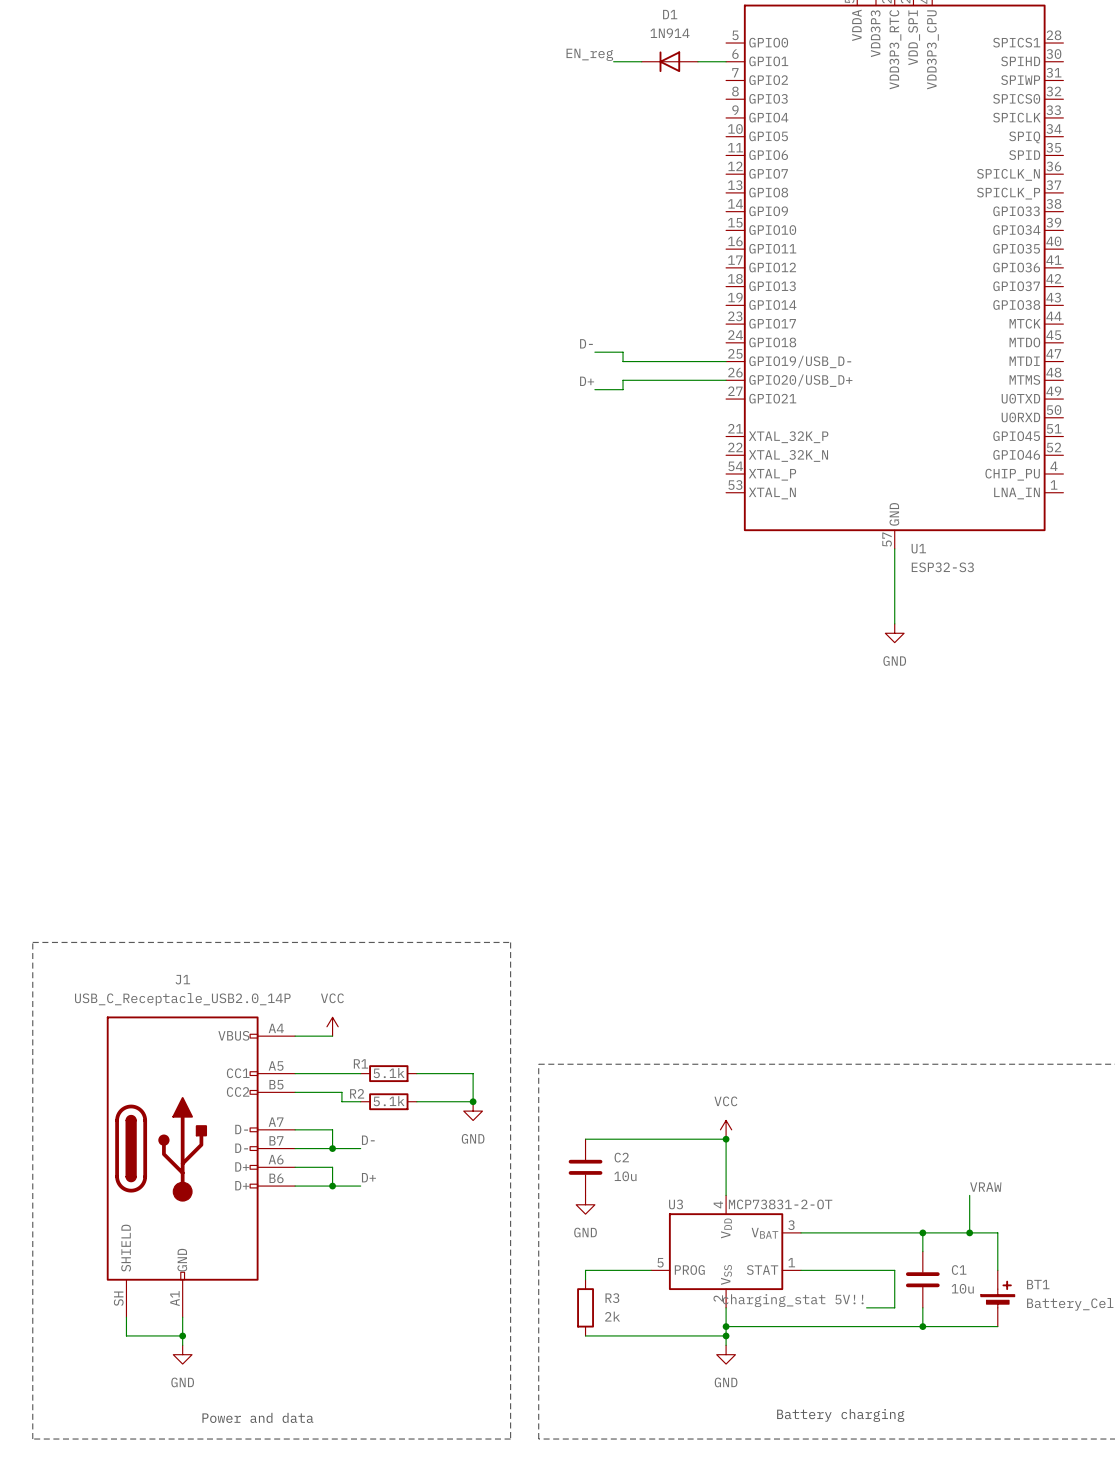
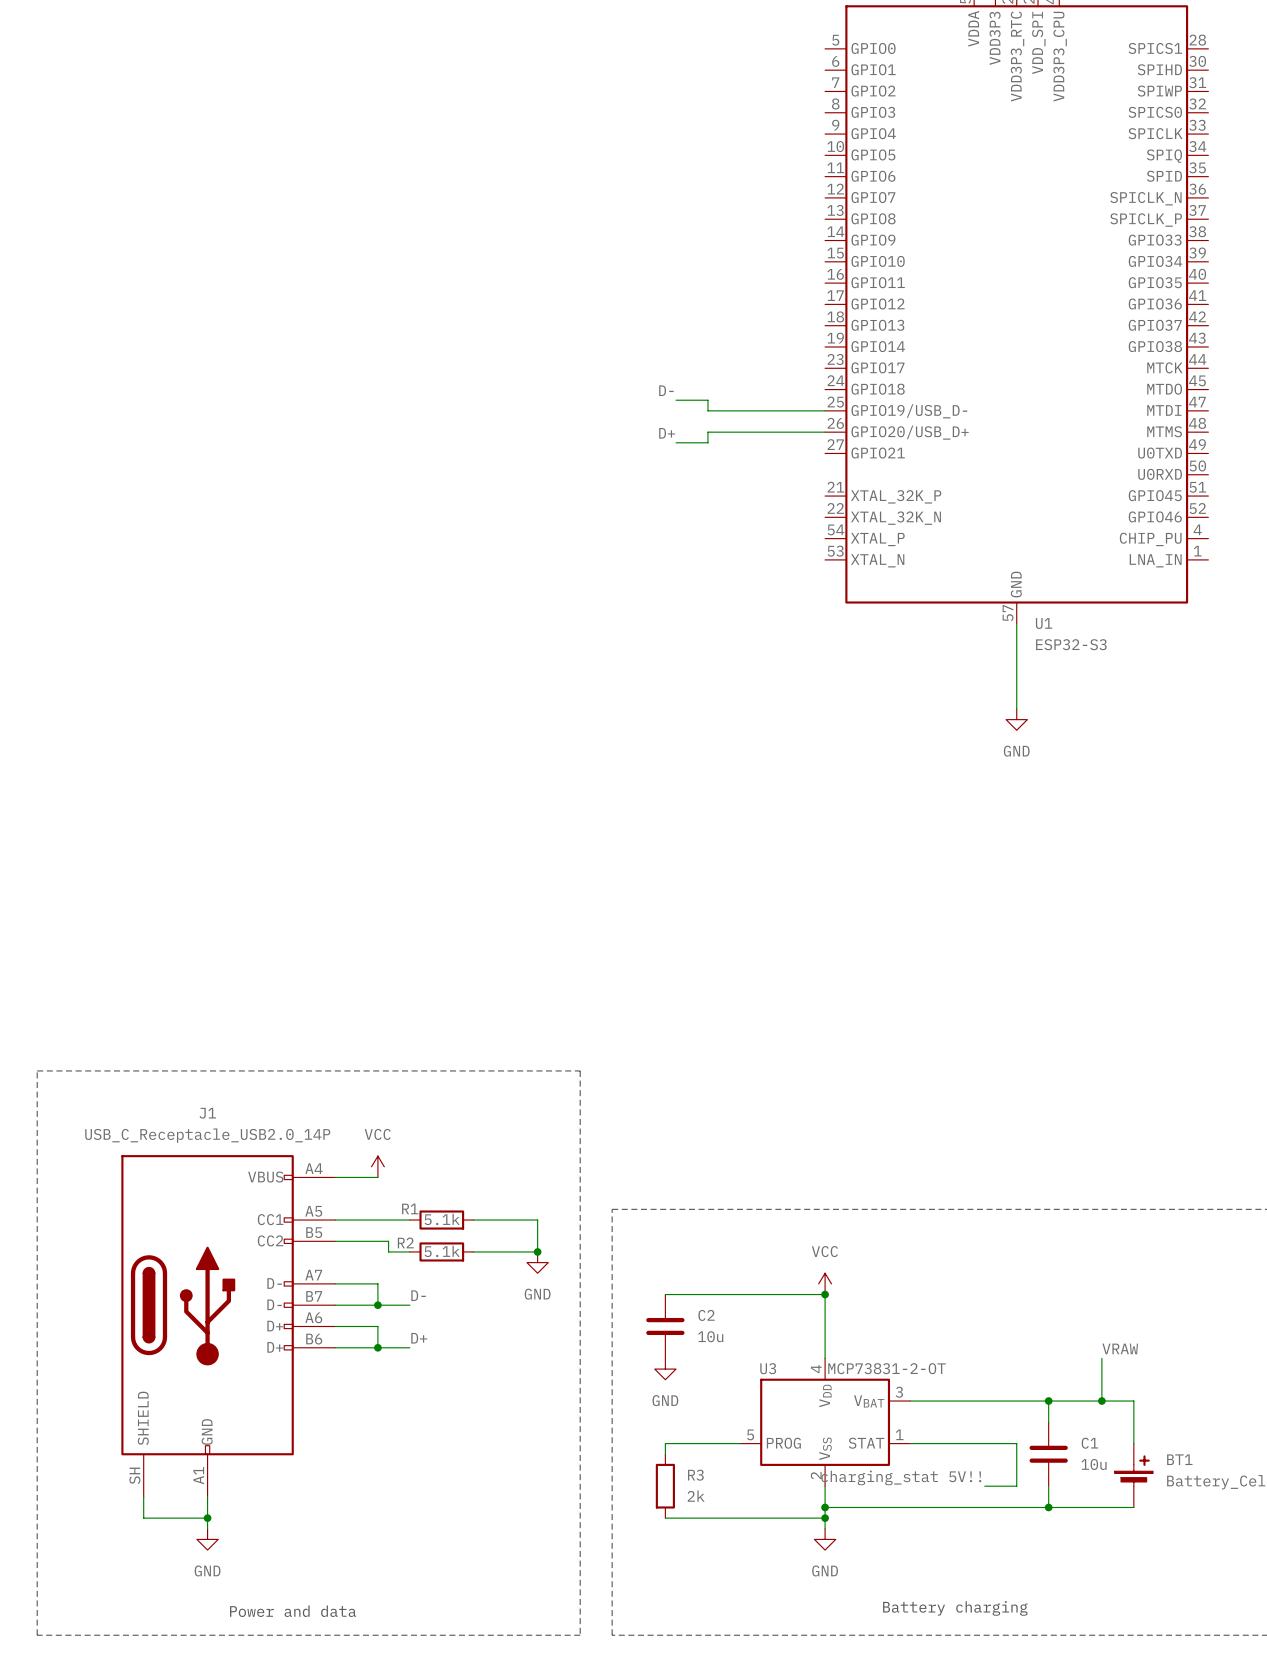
label: EN_reg (589, 54) -> none
wire: (613, 61) (641, 61) -> none
D1: 1N914 (669, 61) -> none
wire: (697, 61) (726, 61) -> none

